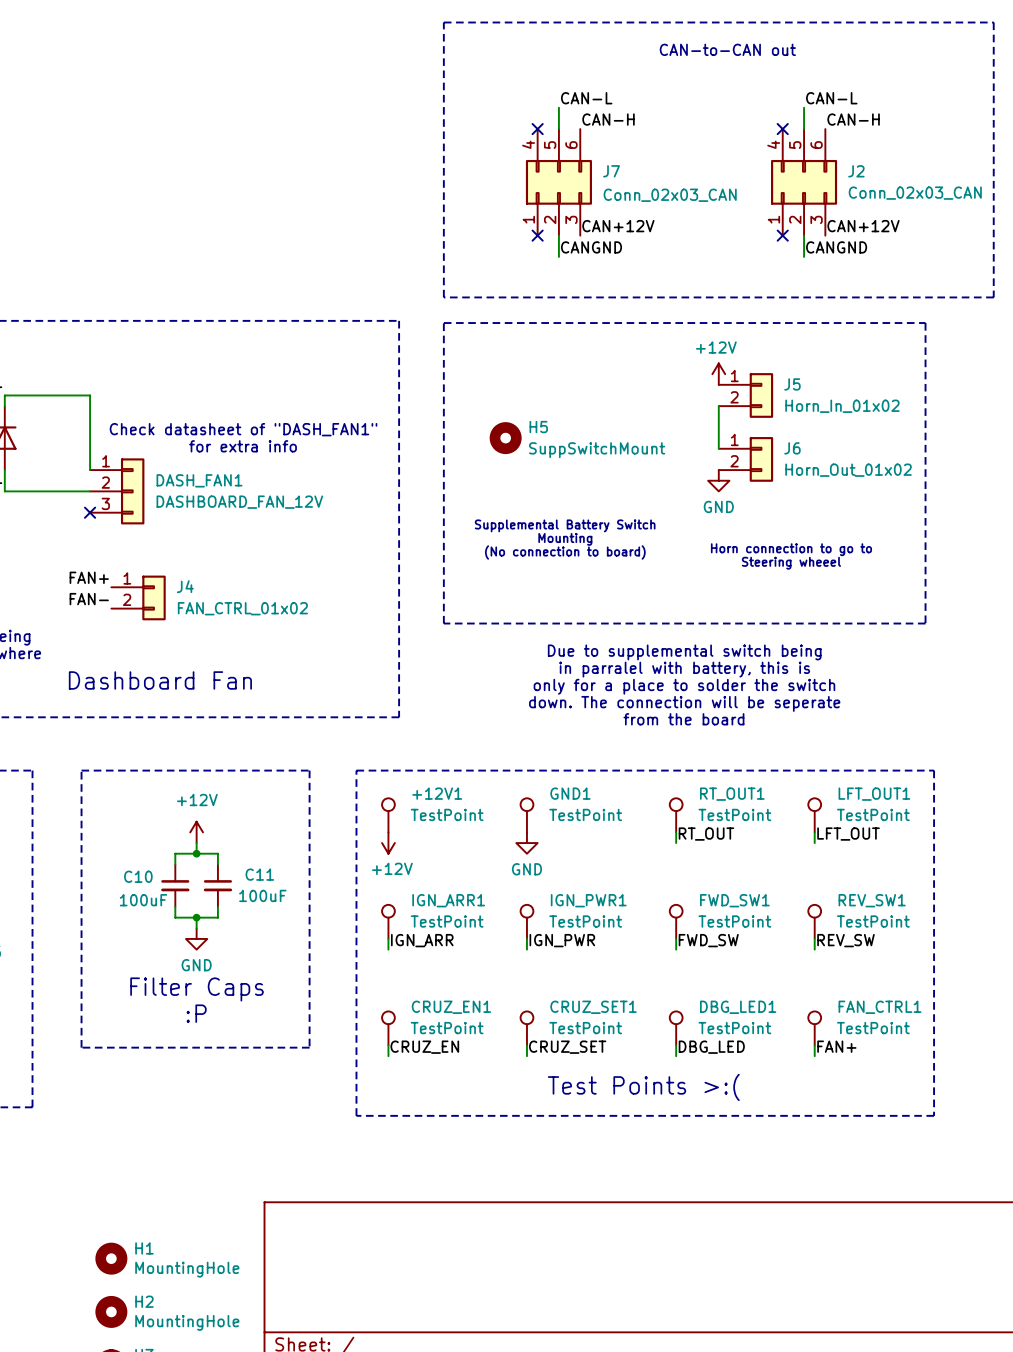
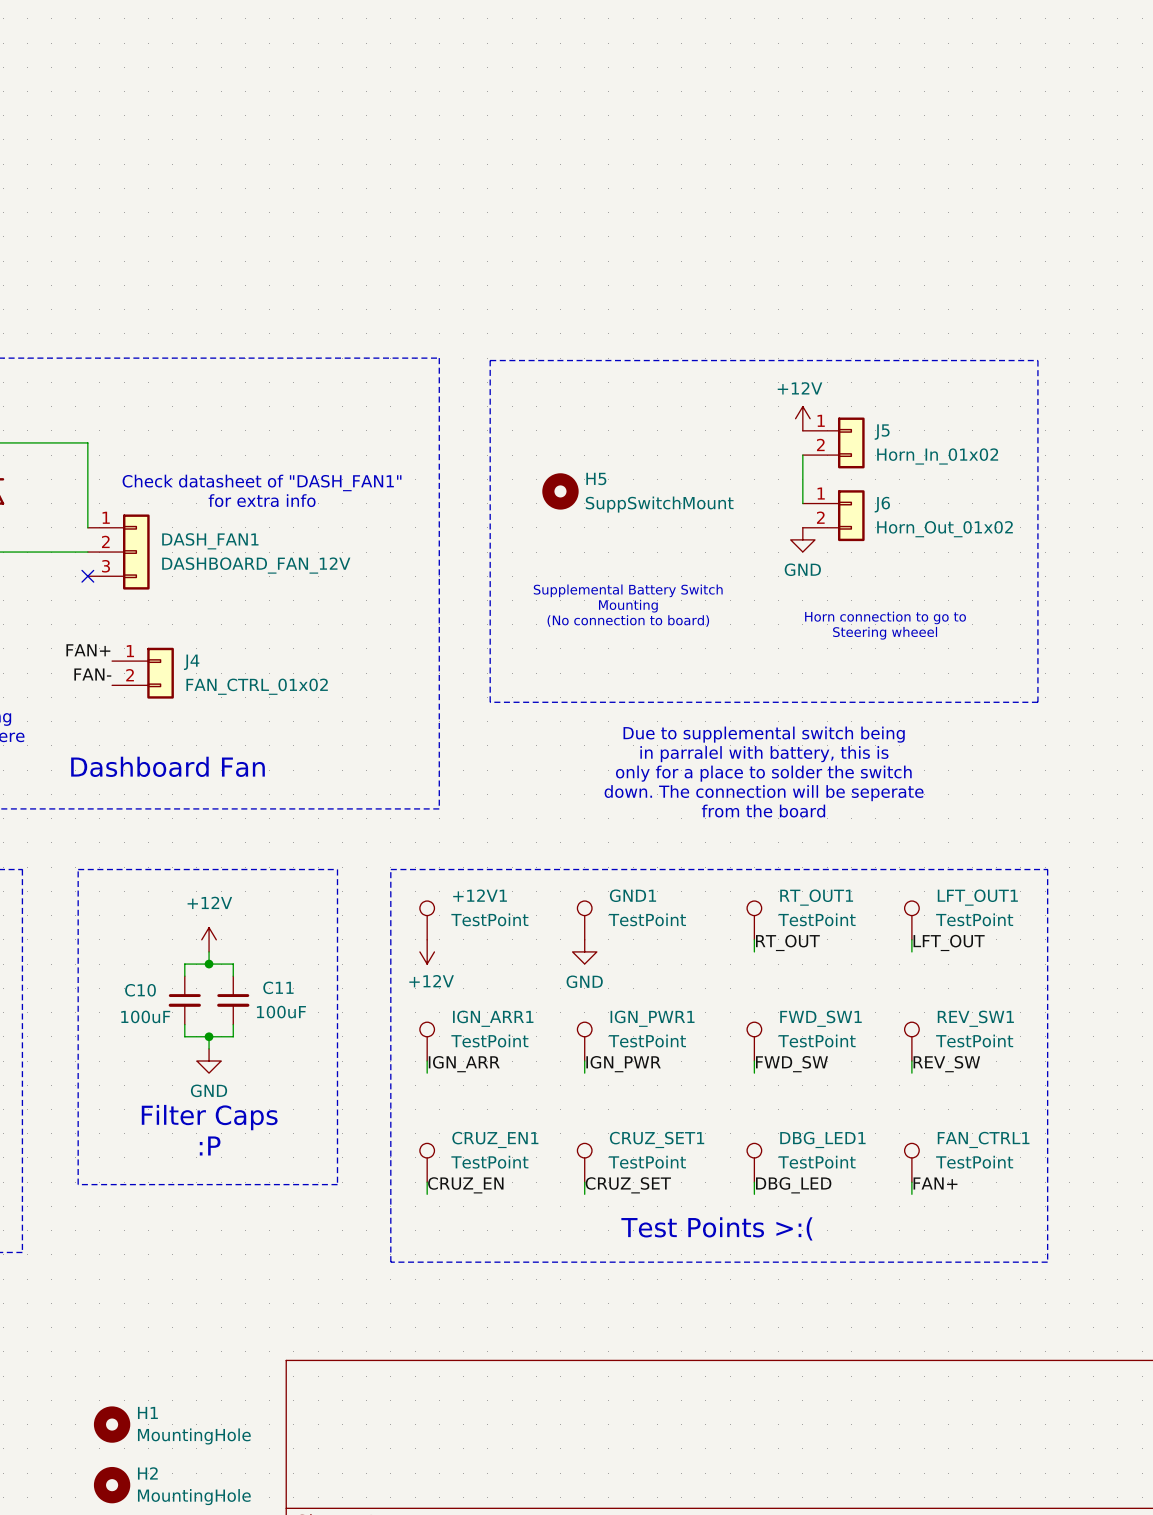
line: (443, 22) (993, 22) (993, 297) (443, 297) (443, 22) -> none
text: CAN-to-CAN out (727, 49) -> none
label: CAN-L (586, 98) -> none
label: CAN-L (831, 98) -> none
wire: (558, 107) (558, 129) -> none
wire: (804, 107) (804, 129) -> none
label: CAN-H (608, 119) -> none
label: CAN-H (853, 119) -> none
no-connect mark: (537, 129) -> none
no-connect mark: (782, 129) -> none
J7: Conn_02x03_CAN (558, 182) -> none
J2: Conn_02x03_CAN (804, 182) -> none
label: CAN+12V (618, 226) -> none
label: CAN+12V (863, 226) -> none
no-connect mark: (537, 235) -> none
wire: (558, 235) (558, 256) -> none
no-connect mark: (782, 235) -> none
wire: (804, 235) (804, 256) -> none
label: CANGND (591, 247) -> none
label: CANGND (836, 247) -> none

